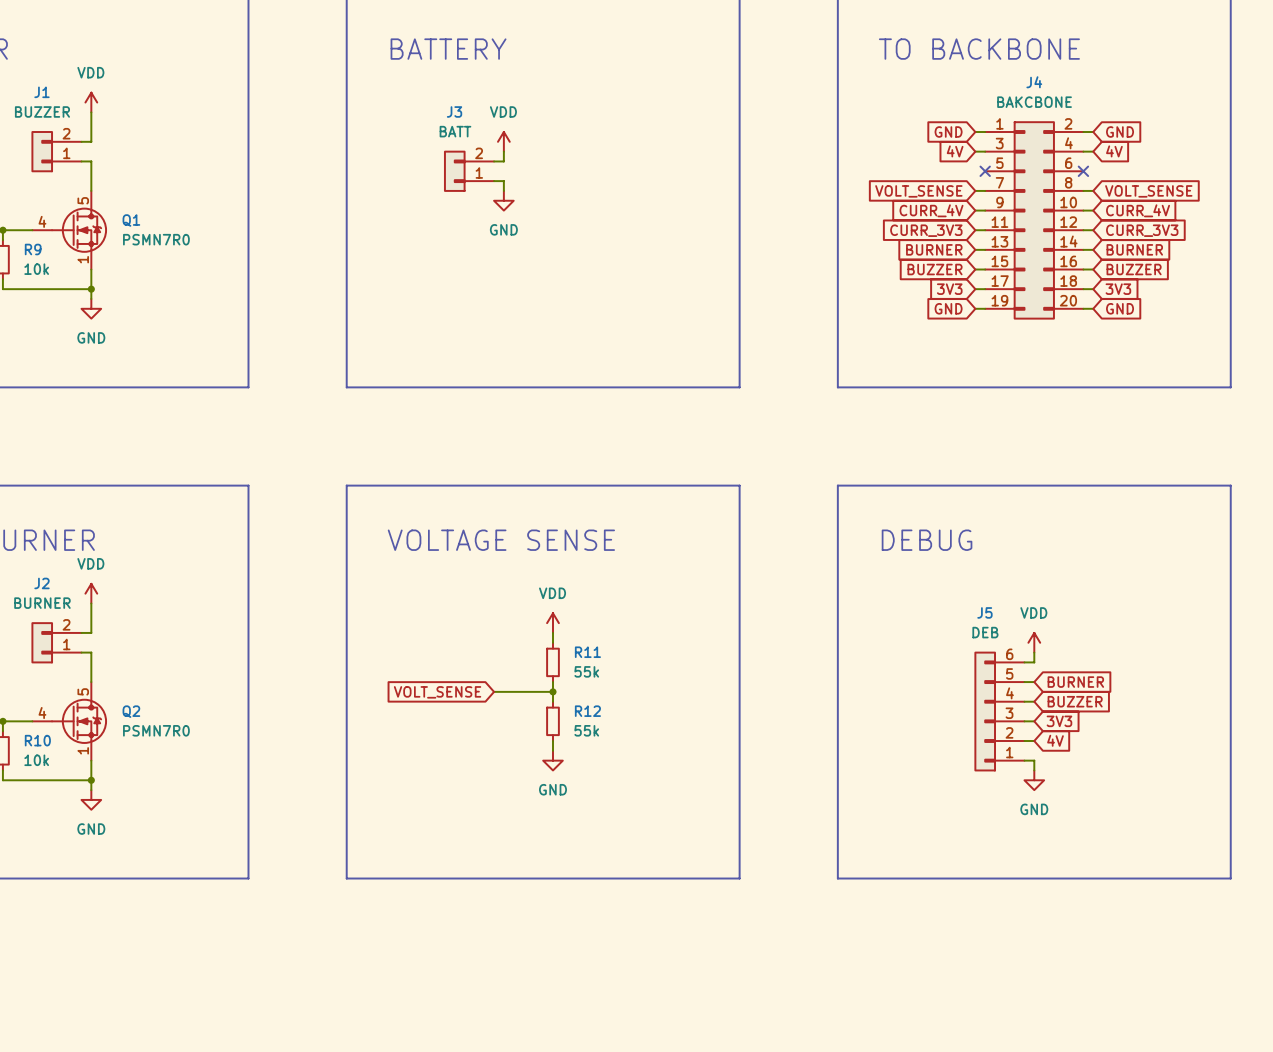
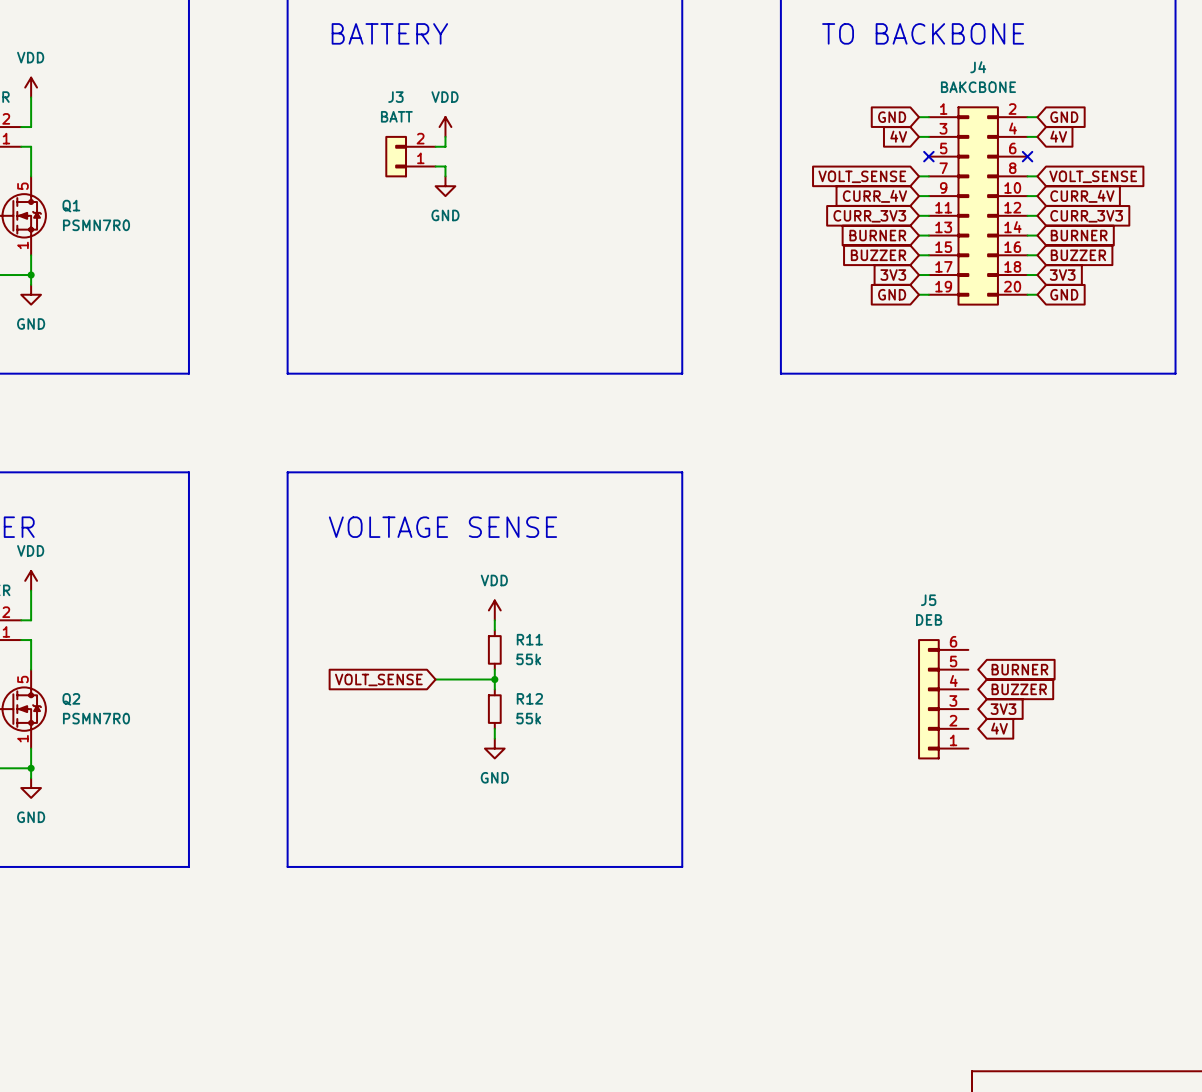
line: (837, 485) (837, 878) (1230, 878) (1230, 485) (837, 485) -> none
text: DEBUG (927, 540) -> none
power symbol: VDD (1034, 642) -> none
wire: (1034, 652) (1034, 662) (1024, 662) -> none
wire: (1024, 682) (1034, 682) -> none
wire: (1024, 701) (1034, 701) -> none
wire: (1024, 721) (1034, 721) -> none
wire: (1024, 741) (1034, 741) -> none
wire: (1024, 760) (1034, 760) (1034, 770) -> none
power symbol: GND (1034, 780) -> none

